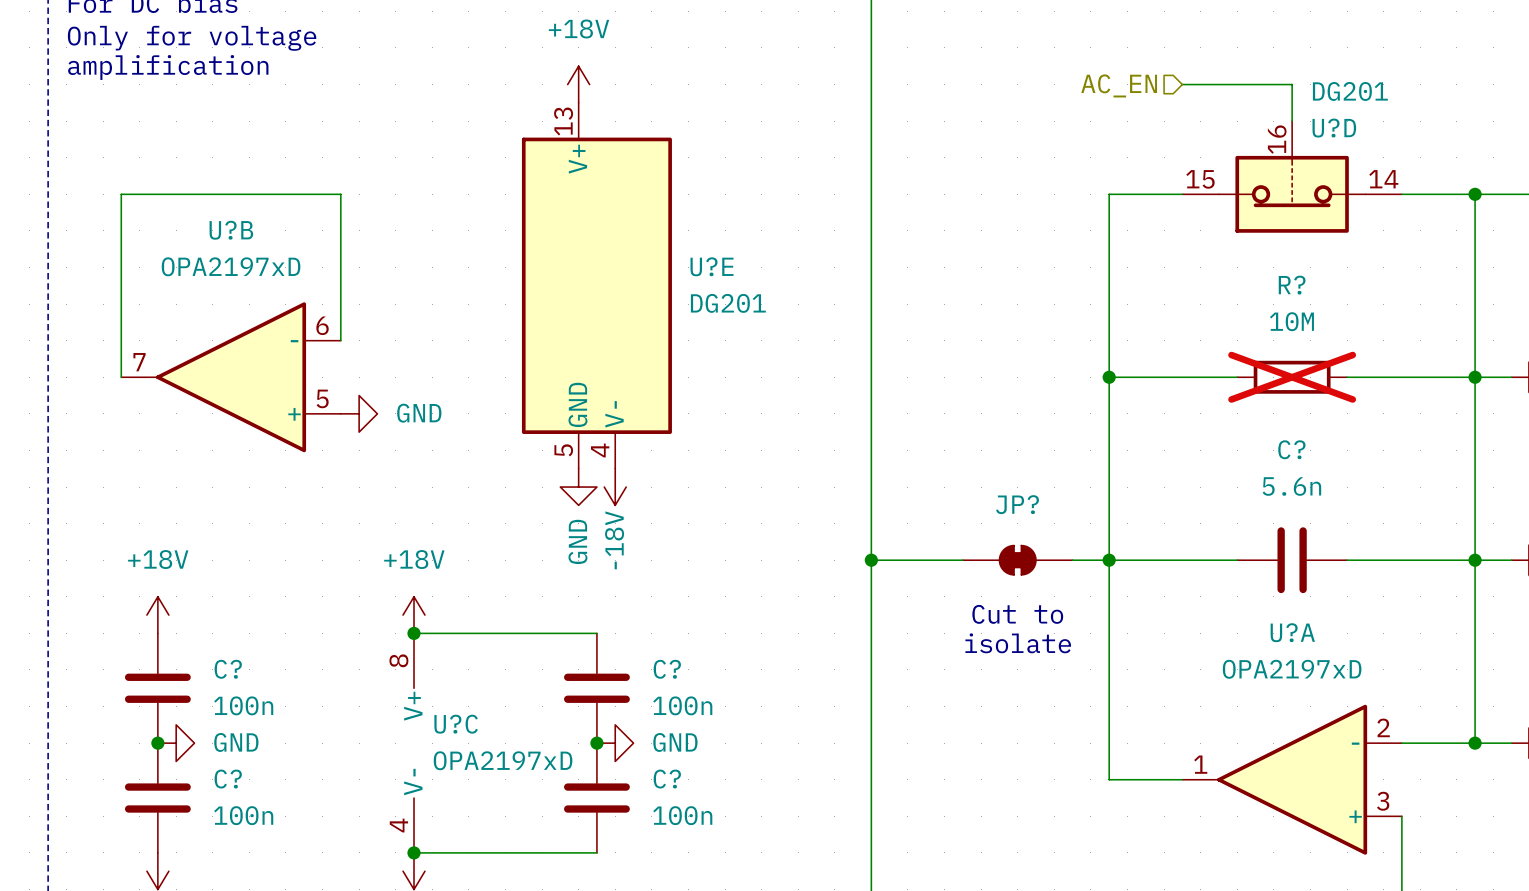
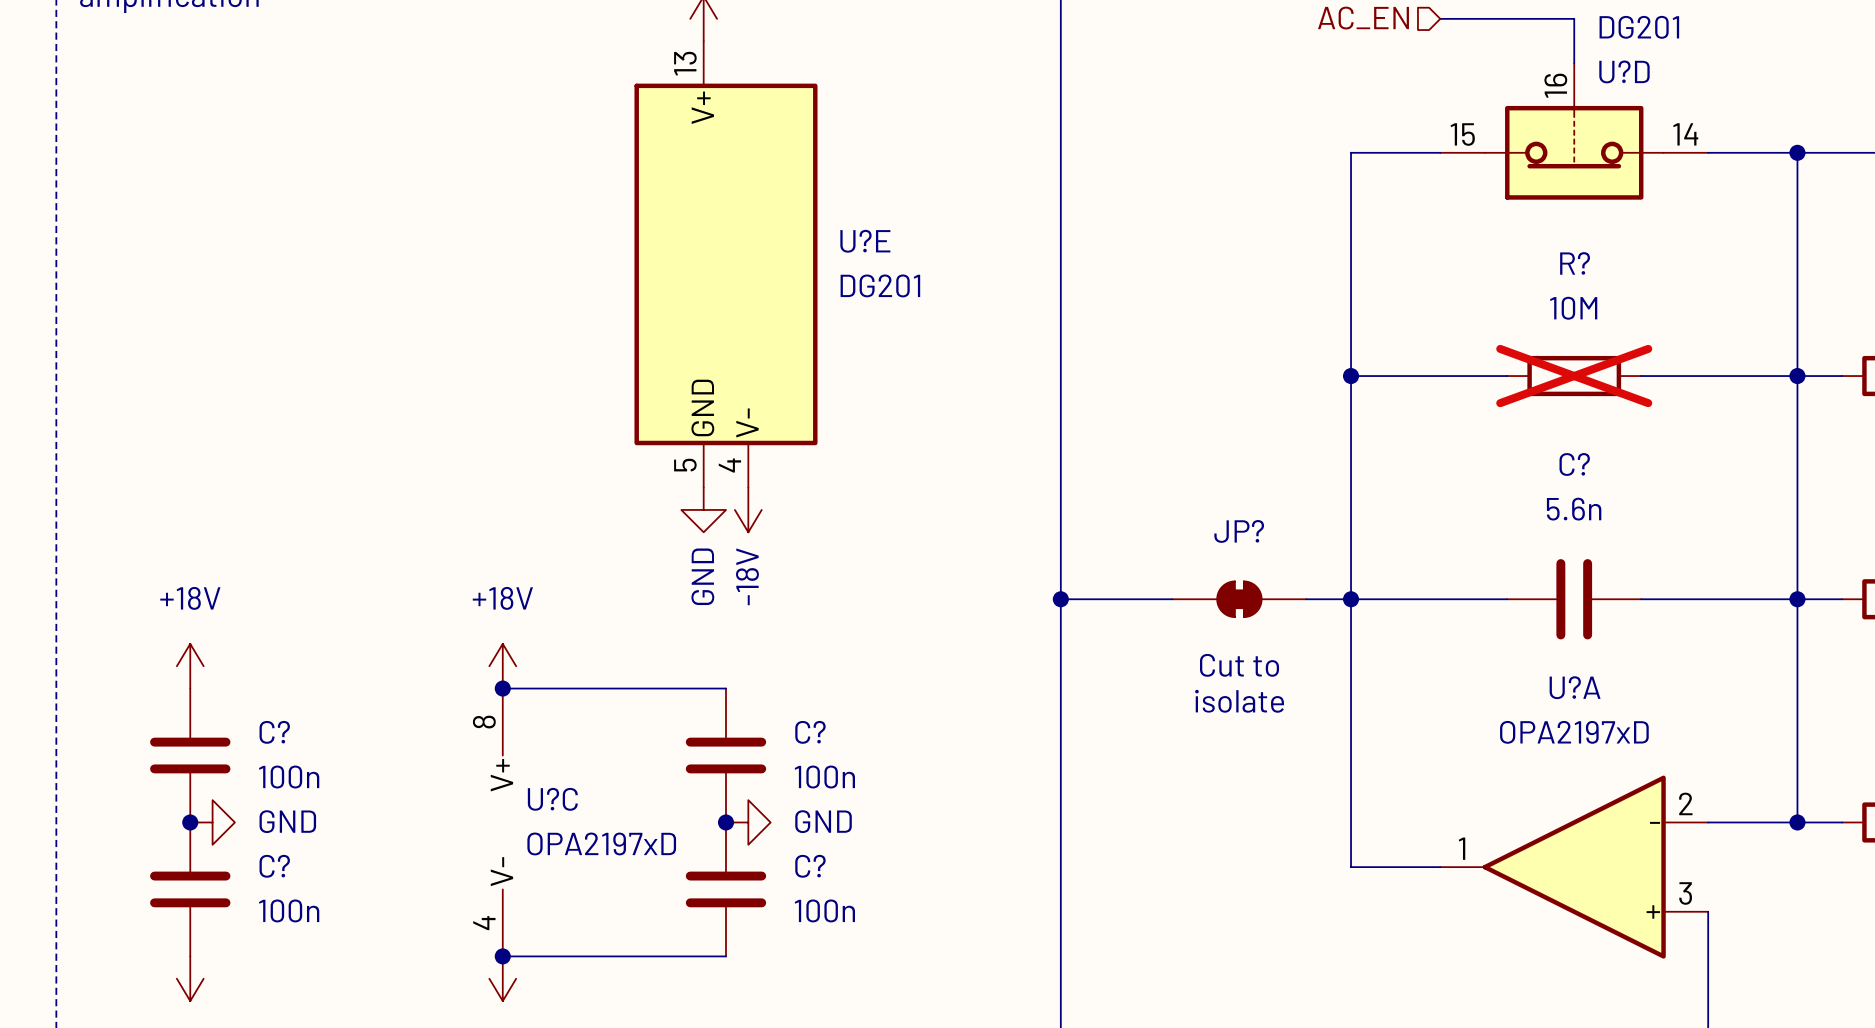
wire: (340, 340) (340, 194) (121, 194) (121, 377) -> none
U?B: OPA2197xD (231, 377) -> none
power symbol: GND (359, 413) -> none

